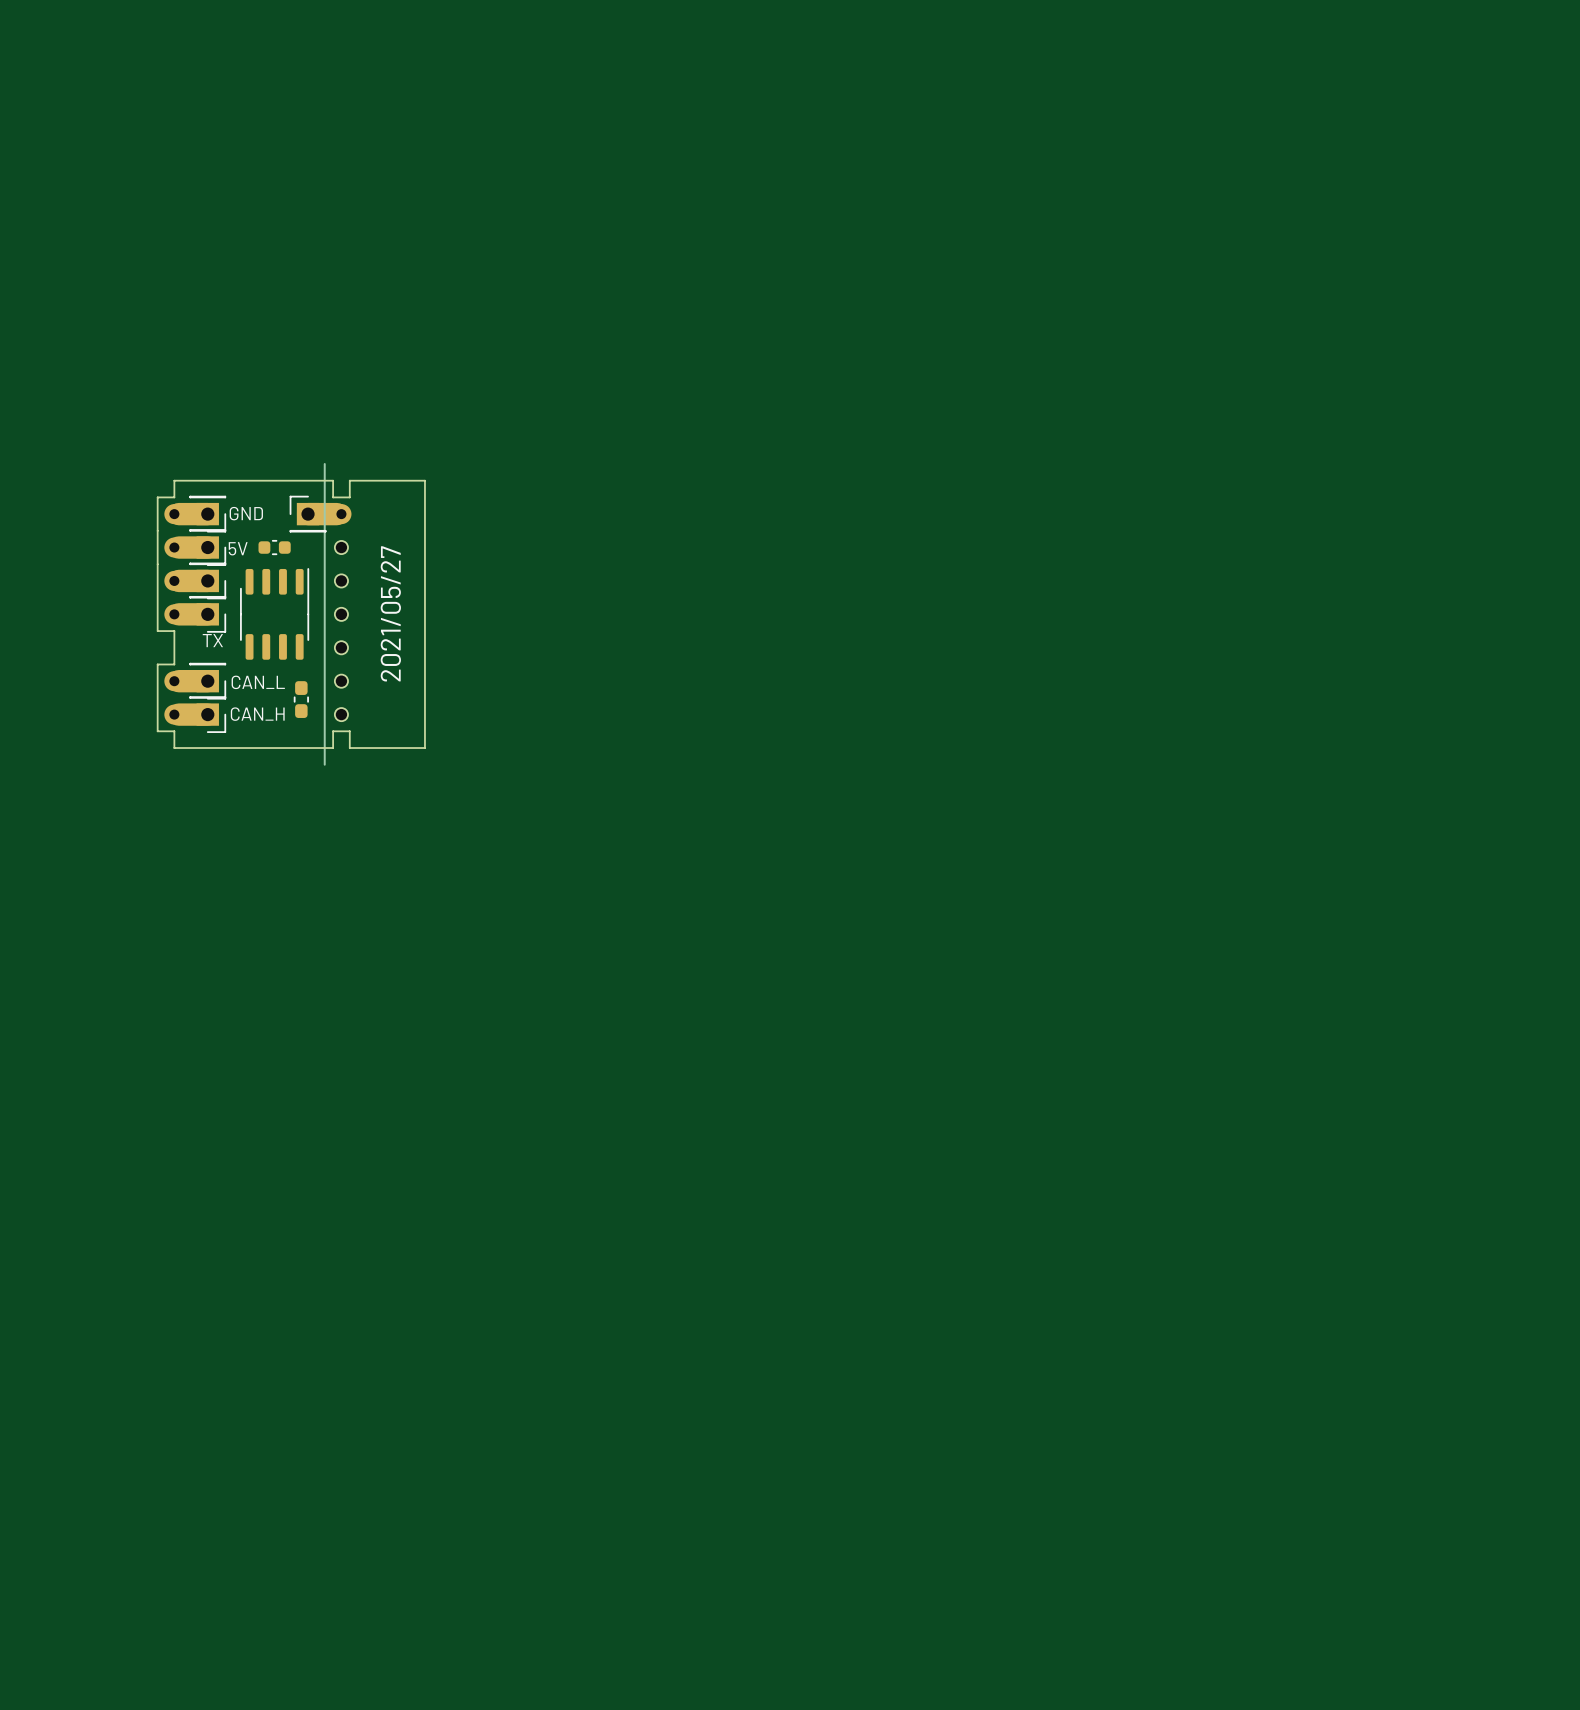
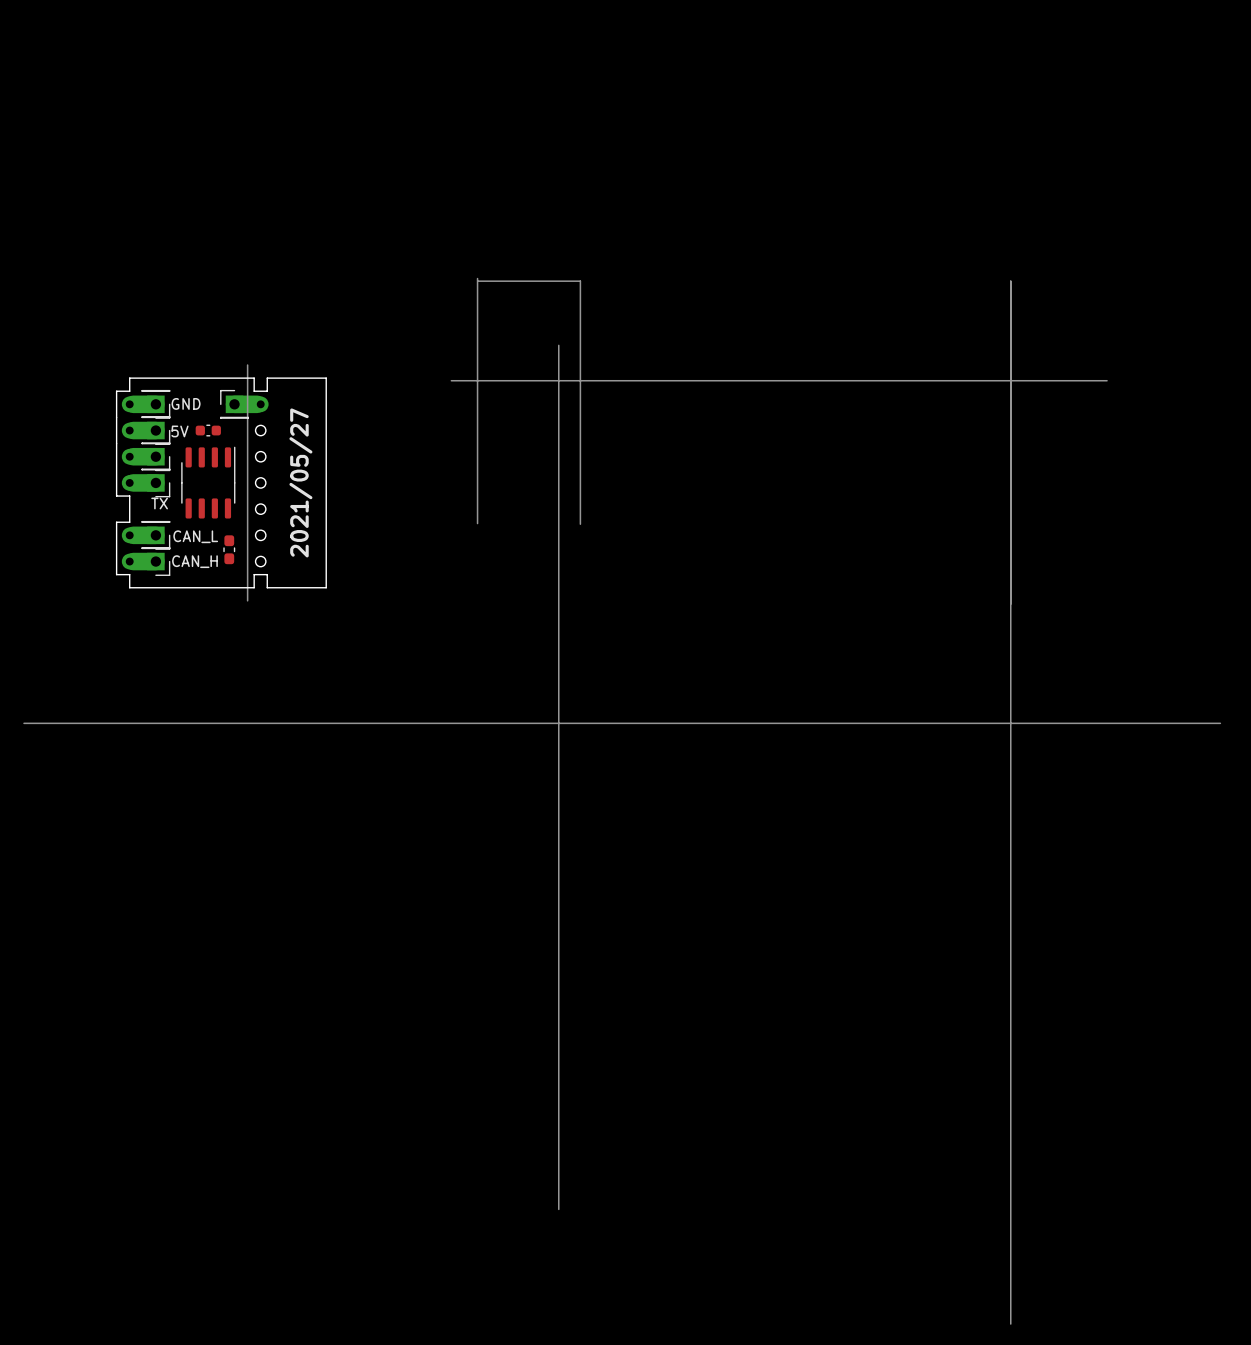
line: none -> (477, 278) (477, 523)
line: none -> (478, 281) (580, 281) (580, 524)
line: none -> (1010, 281) (1010, 1324)
line: none -> (558, 345) (558, 1209)
line: none -> (451, 380) (1107, 380)
line: none -> (23, 723) (1220, 723)

